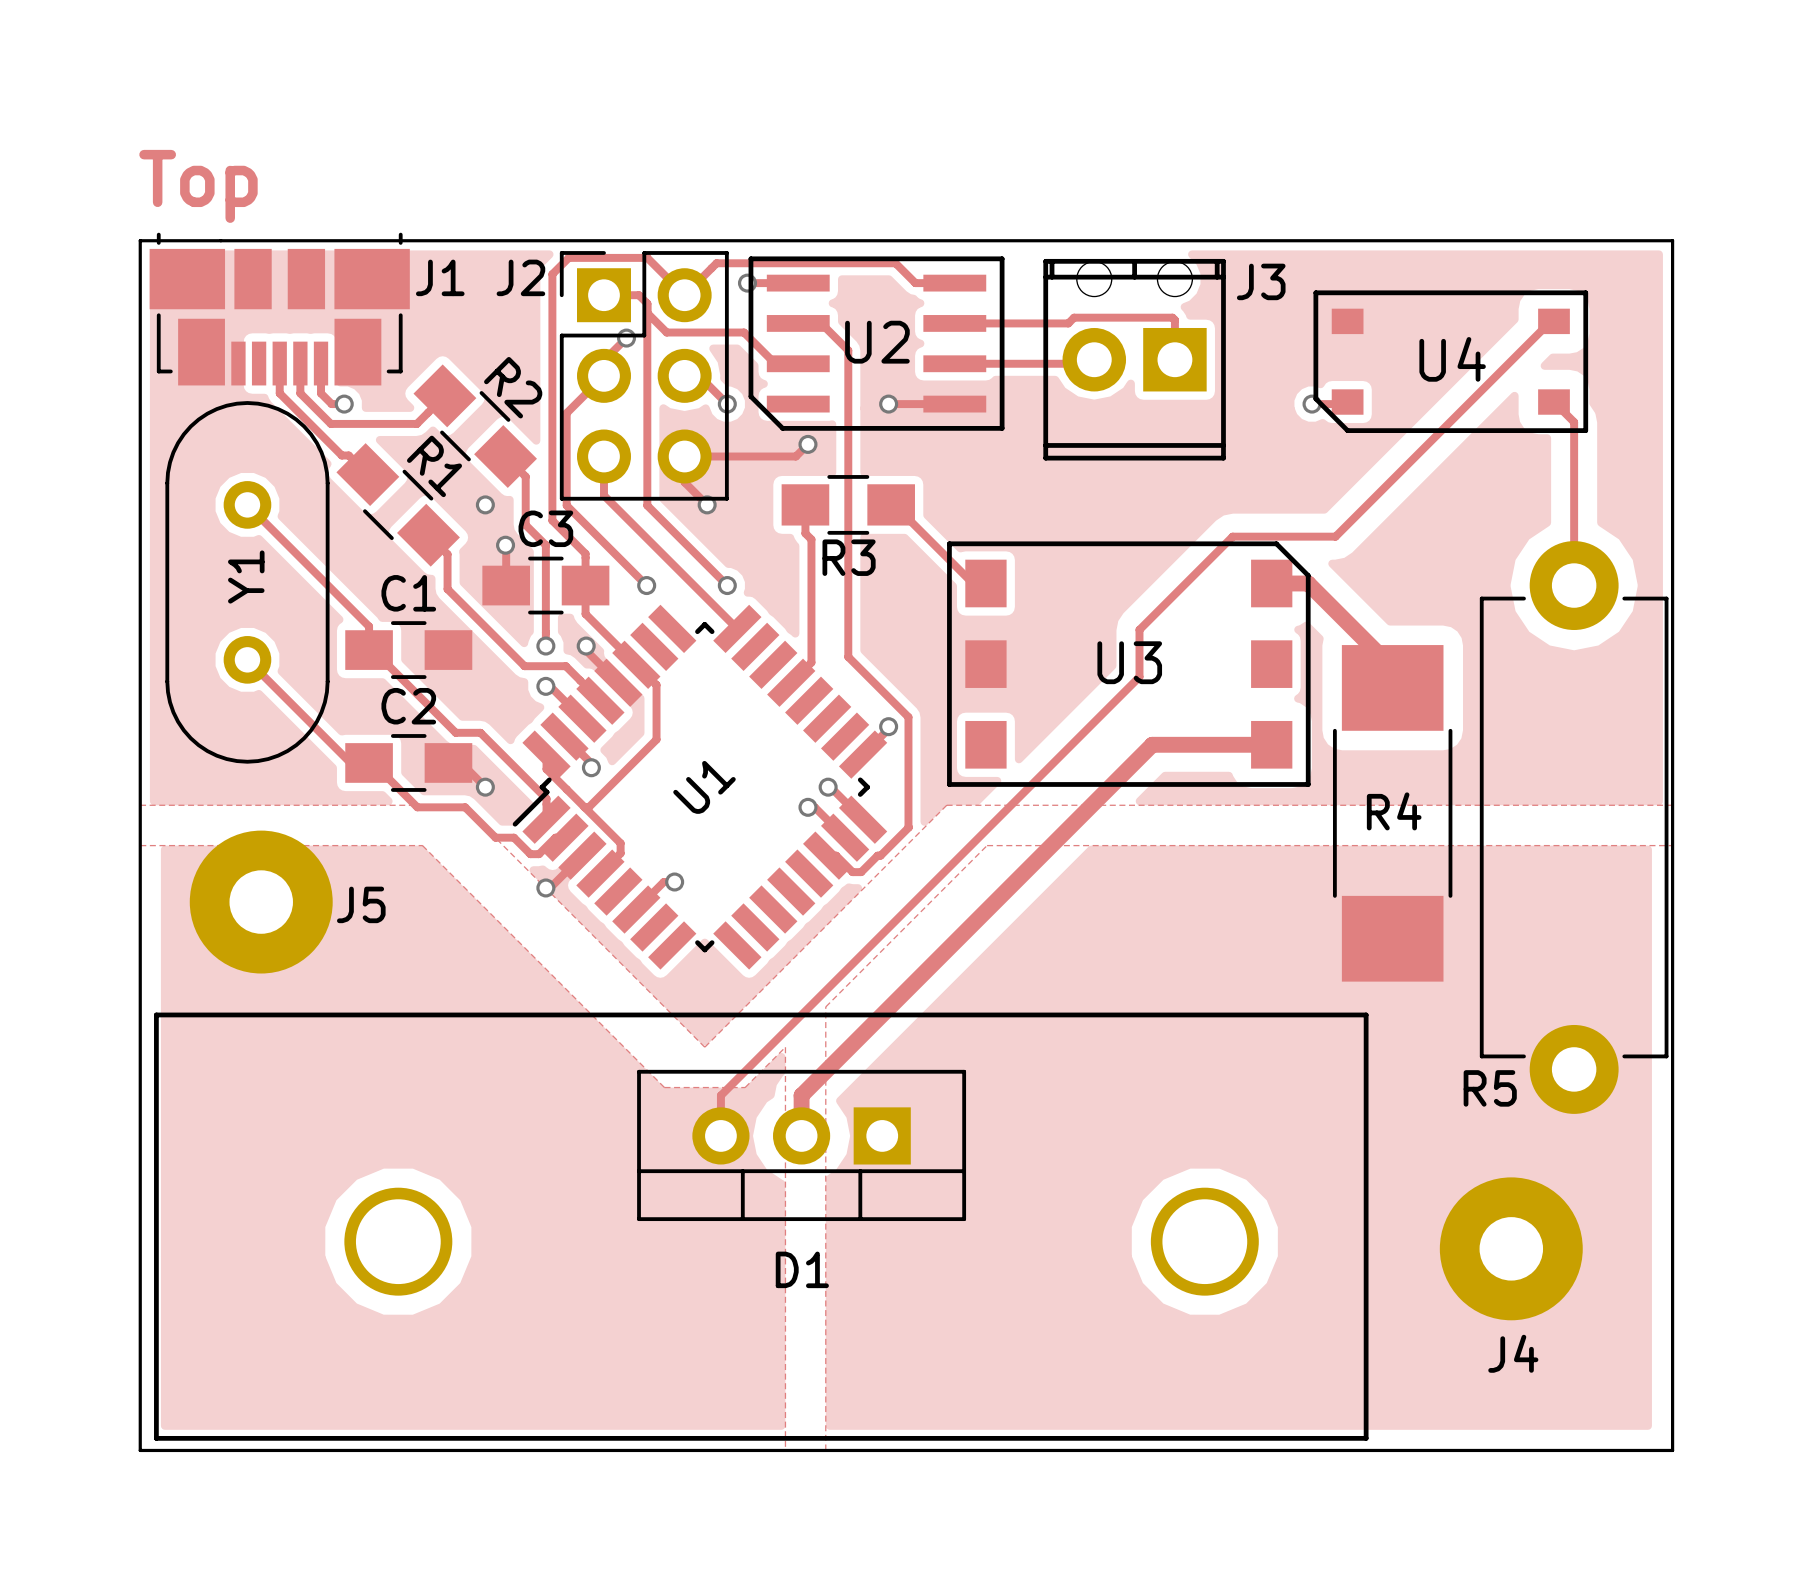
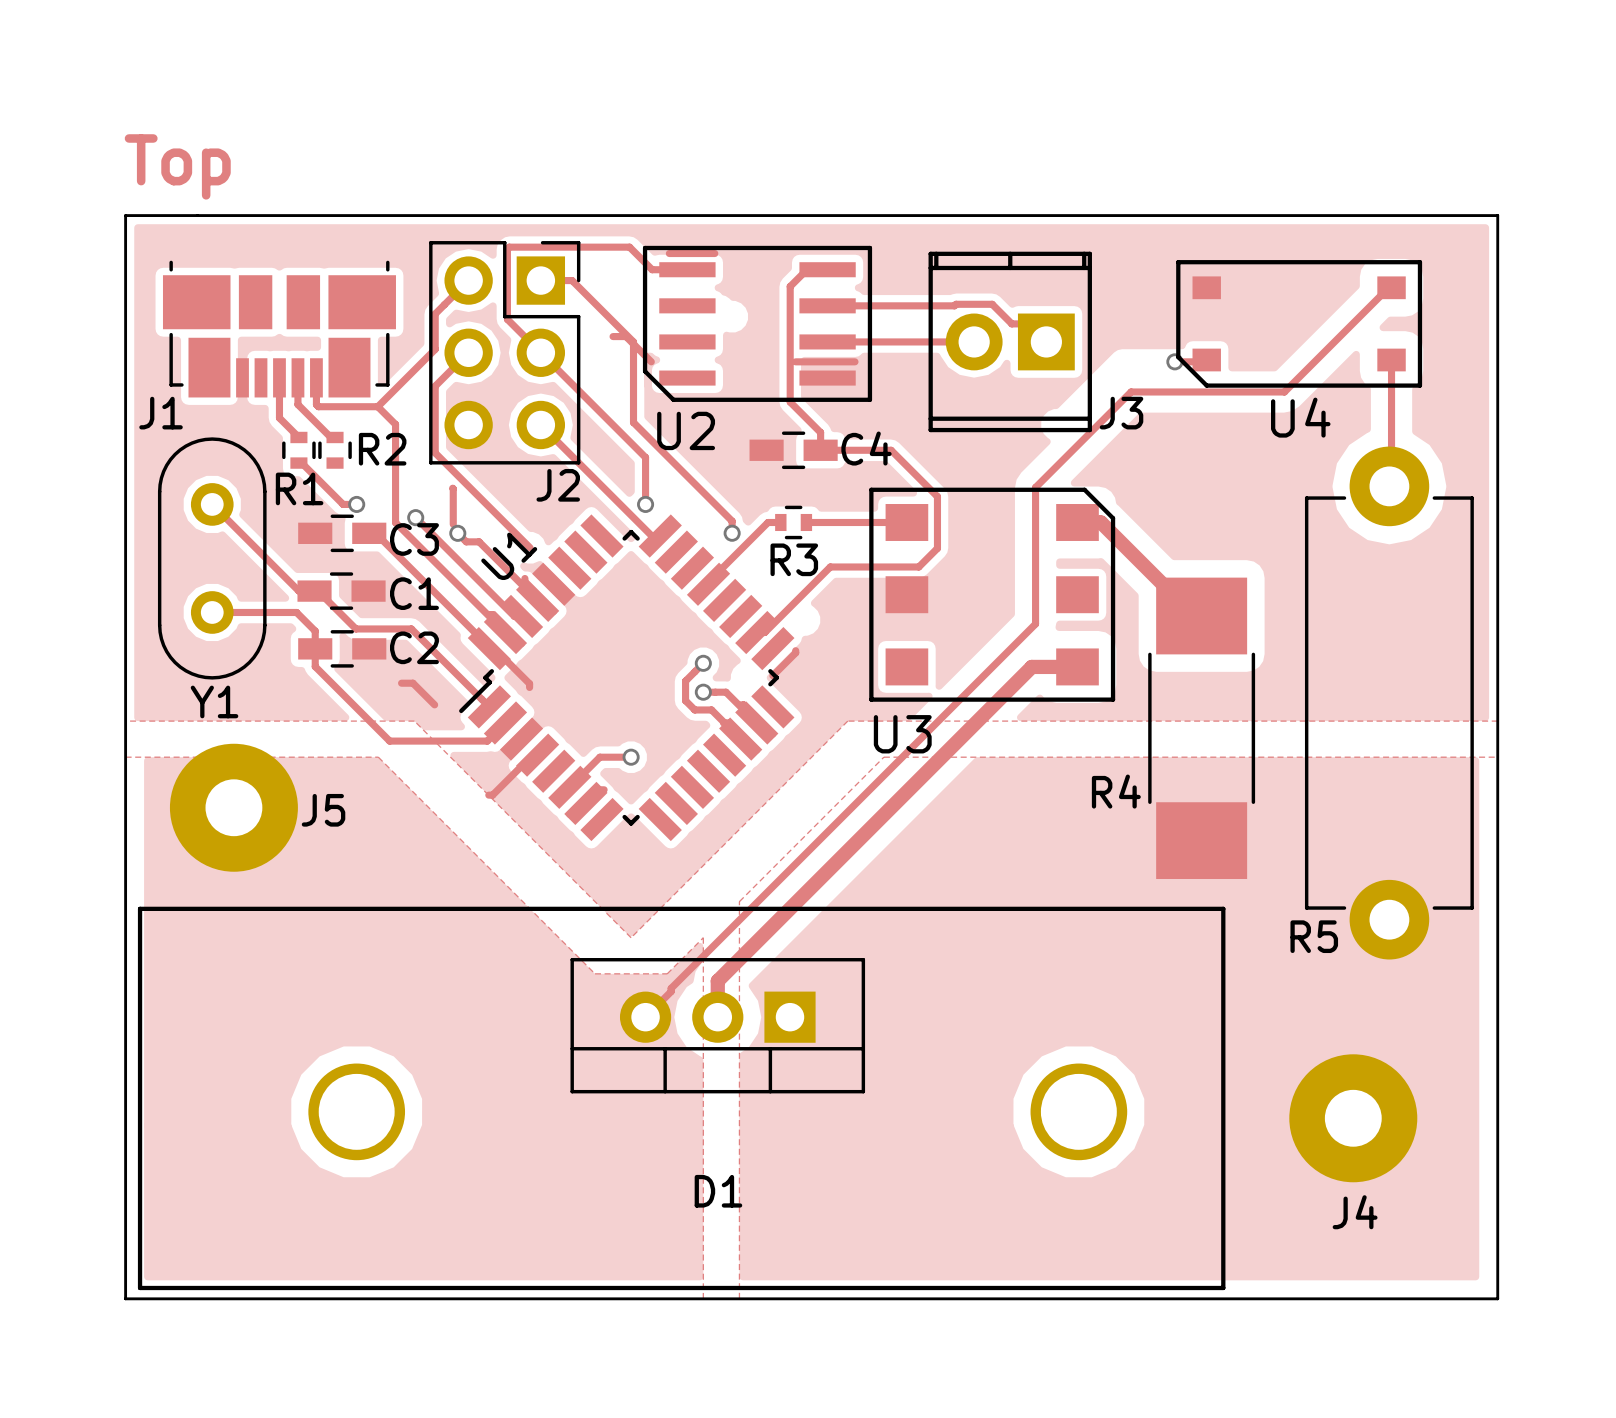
J2 footprint: [559, 251, 729, 501] -> [429, 241, 581, 465]
J3 footprint: [1043, 258, 1226, 461] -> [928, 251, 1092, 433]
J1 name position: J1 (440, 277) -> J1 (161, 413)
J2 name position: J2 (520, 277) -> J2 (558, 485)
J3 name position: J3 (1261, 281) -> J3 (1121, 413)
via: (747, 283) -> none
track: (954, 283) (915, 283) (895, 263) (716, 263) (684, 295) (647, 257) (568, 257) (552, 274) (552, 520) (585, 553) (585, 614) (656, 685) (656, 739) (588, 807) (584, 807) -> none
track: (603, 295) (638, 295) (647, 303) (647, 505) (727, 585) -> none
track: none -> (687, 269) (652, 269) (629, 247) (509, 247) (507, 249) (507, 319) (645, 457) (645, 504)
track: none -> (827, 269) (806, 269) (790, 286) (790, 402) (820, 432) (820, 450) (891, 450) (937, 496) (937, 548) (918, 566) (830, 566) (764, 632) (756, 632)
J1 position: (279, 309) -> (279, 329)
track: none -> (468, 280) (435, 313) (435, 349) (377, 406)
track: none -> (540, 280) (572, 280) (633, 341) (633, 422) (732, 521) (732, 533)
track: (647, 313) (666, 332) (744, 332) (775, 363) (798, 363) -> none
track: (798, 323) (821, 323) (848, 350) (848, 656) (908, 717) (908, 827) -> none
track: (954, 323) (1068, 323) (1074, 317) (1172, 317) (1174, 320) (1174, 359) -> none
track: (626, 338) (603, 360) (603, 375) (566, 413) (566, 505) (646, 585) -> none
via: (626, 338) -> none
track: none -> (827, 305) (992, 304) (1011, 323) (1028, 323) (1046, 341)
U2 name position: U2 (877, 342) -> U2 (686, 430)
U2 position: (876, 343) -> (757, 323)
track: (1094, 359) (1090, 363) (954, 363) -> none
U4 name position: U4 (1452, 359) -> U4 (1300, 417)
track: (279, 363) (279, 393) (341, 455) (348, 455) (367, 474) -> none
track: (300, 363) (300, 393) (330, 423) (416, 423) (444, 395) -> none
track: (321, 363) (321, 393) (331, 404) (344, 404) -> none
R2 footprint: [413, 364, 537, 488] -> [318, 431, 352, 469]
track: none -> (827, 341) (974, 341)
track: none -> (468, 352) (435, 386) (435, 452) (530, 547)
Y1 footprint: [165, 401, 330, 764] -> [157, 437, 267, 680]
track: (1554, 402) (1574, 422) (1574, 585) -> (1391, 360) (1391, 484) (1389, 486)
via: (344, 404) -> none
via: (727, 404) -> none
via: (888, 404) -> none
track: none -> (279, 377) (279, 418) (298, 437)
track: none -> (297, 377) (297, 404) (330, 437) (335, 437)
track: none -> (316, 377) (316, 404) (318, 406) (377, 406)
track: (1434, 437) (1335, 536) (1232, 536) (1139, 629) (1139, 676) (720, 1095) (720, 1135) -> (1284, 391) (1131, 391) (1035, 487) (1035, 624) (671, 988) (671, 991) (645, 1017)
R1 footprint: [336, 443, 460, 567] -> [282, 431, 316, 469]
track: (807, 444) (795, 456) (684, 456) (684, 482) (707, 504) -> none
via: (807, 444) -> none
track: none -> (377, 406) (395, 424) (395, 522) (505, 632)
track: (505, 456) (525, 476) (525, 525) (545, 545) (545, 646) -> none
track: (603, 456) (603, 495) (737, 628) -> none
R1 name position: R1 (434, 466) -> R1 (299, 488)
track: none -> (540, 425) (651, 536) (660, 536)
R3 footprint: [781, 475, 915, 535] -> [775, 505, 813, 540]
C4: none -> (793, 450)
track: (247, 504) (369, 626) (369, 650) (373, 650) (455, 732) (480, 732) (546, 798) (546, 819) -> none
via: (485, 504) -> none
via: (707, 504) -> none
track: (805, 504) (805, 533) (811, 539) (811, 662) (791, 682) -> none
track: (891, 504) (894, 504) (972, 583) -> (806, 522) (871, 522)
track: none -> (298, 463) (301, 463) (343, 504) (356, 504)
C3 name position: C3 (545, 528) -> C3 (414, 539)
track: (428, 535) (447, 554) (447, 589) (524, 666) (565, 666) (600, 700) -> none
U3 footprint: [947, 541, 1311, 787] -> [869, 487, 1116, 702]
via: (505, 545) -> none
C3 footprint: [482, 556, 610, 615] -> [298, 514, 387, 553]
track: none -> (212, 504) (298, 591) (318, 591) (355, 628) (411, 628) (489, 706)
via: none -> (356, 504)
Y1 name position: Y1 (246, 577) -> Y1 (214, 701)
track: none -> (415, 517) (514, 616) (521, 616)
via: none -> (415, 517)
track: none -> (780, 522) (768, 522) (708, 581) (708, 584)
track: none -> (1077, 522) (1101, 522) (1194, 616) (1201, 616)
track: (1271, 583) (1308, 583) (1392, 667) (1392, 687) -> none
via: (646, 585) -> none
via position: (727, 585) -> (645, 504)
C1 name position: C1 (408, 593) -> C1 (414, 593)
track: none -> (369, 533) (375, 533) (489, 648)
track: none -> (457, 533) (466, 541) (479, 541) (537, 600)
via: none -> (457, 533)
via: none -> (732, 533)
C1 footprint: [345, 621, 473, 679] -> [297, 572, 386, 610]
via: (545, 646) -> none
via: (586, 646) -> none
track: (247, 659) (350, 762) (373, 762) (417, 807) (465, 807) (495, 837) (513, 837) (530, 854) (539, 854) (555, 837) (564, 837) -> none
U3 name position: U3 (1129, 662) -> U3 (902, 734)
track: none -> (212, 612) (296, 612) (315, 631) (315, 666) (389, 741) (487, 741) (505, 722)
via: (545, 686) -> none
C2 name position: C2 (408, 706) -> C2 (414, 647)
via: (888, 726) -> none
C2 footprint: [345, 734, 473, 792] -> [298, 630, 387, 668]
track: none -> (703, 663) (685, 681) (685, 700) (694, 709) (711, 709) (740, 739)
via: none -> (703, 663)
track: (1203, 744) (1271, 744) -> none
track: (546, 754) (546, 769) (620, 843) (620, 853) (600, 873) -> none
via: (591, 767) -> none
track: none -> (703, 692) (725, 692) (756, 722)
via: none -> (703, 692)
via: (485, 787) -> none
U1 position: (699, 787) -> (626, 677)
U1 name position: U1 (704, 787) -> U1 (509, 556)
via: (828, 787) -> none
via: (807, 807) -> none
R4 name position: R4 (1394, 811) -> R4 (1116, 791)
R4 position: (1392, 813) -> (1201, 728)
track: (908, 827) (861, 872) (852, 872) (836, 855) (827, 855) -> none
R5 position: (1574, 827) -> (1389, 703)
track: none -> (631, 757) (599, 757) (569, 787)
via position: (674, 882) -> (631, 757)
via: (545, 887) -> none
D1 name position: D1 (802, 1269) -> D1 (718, 1191)

